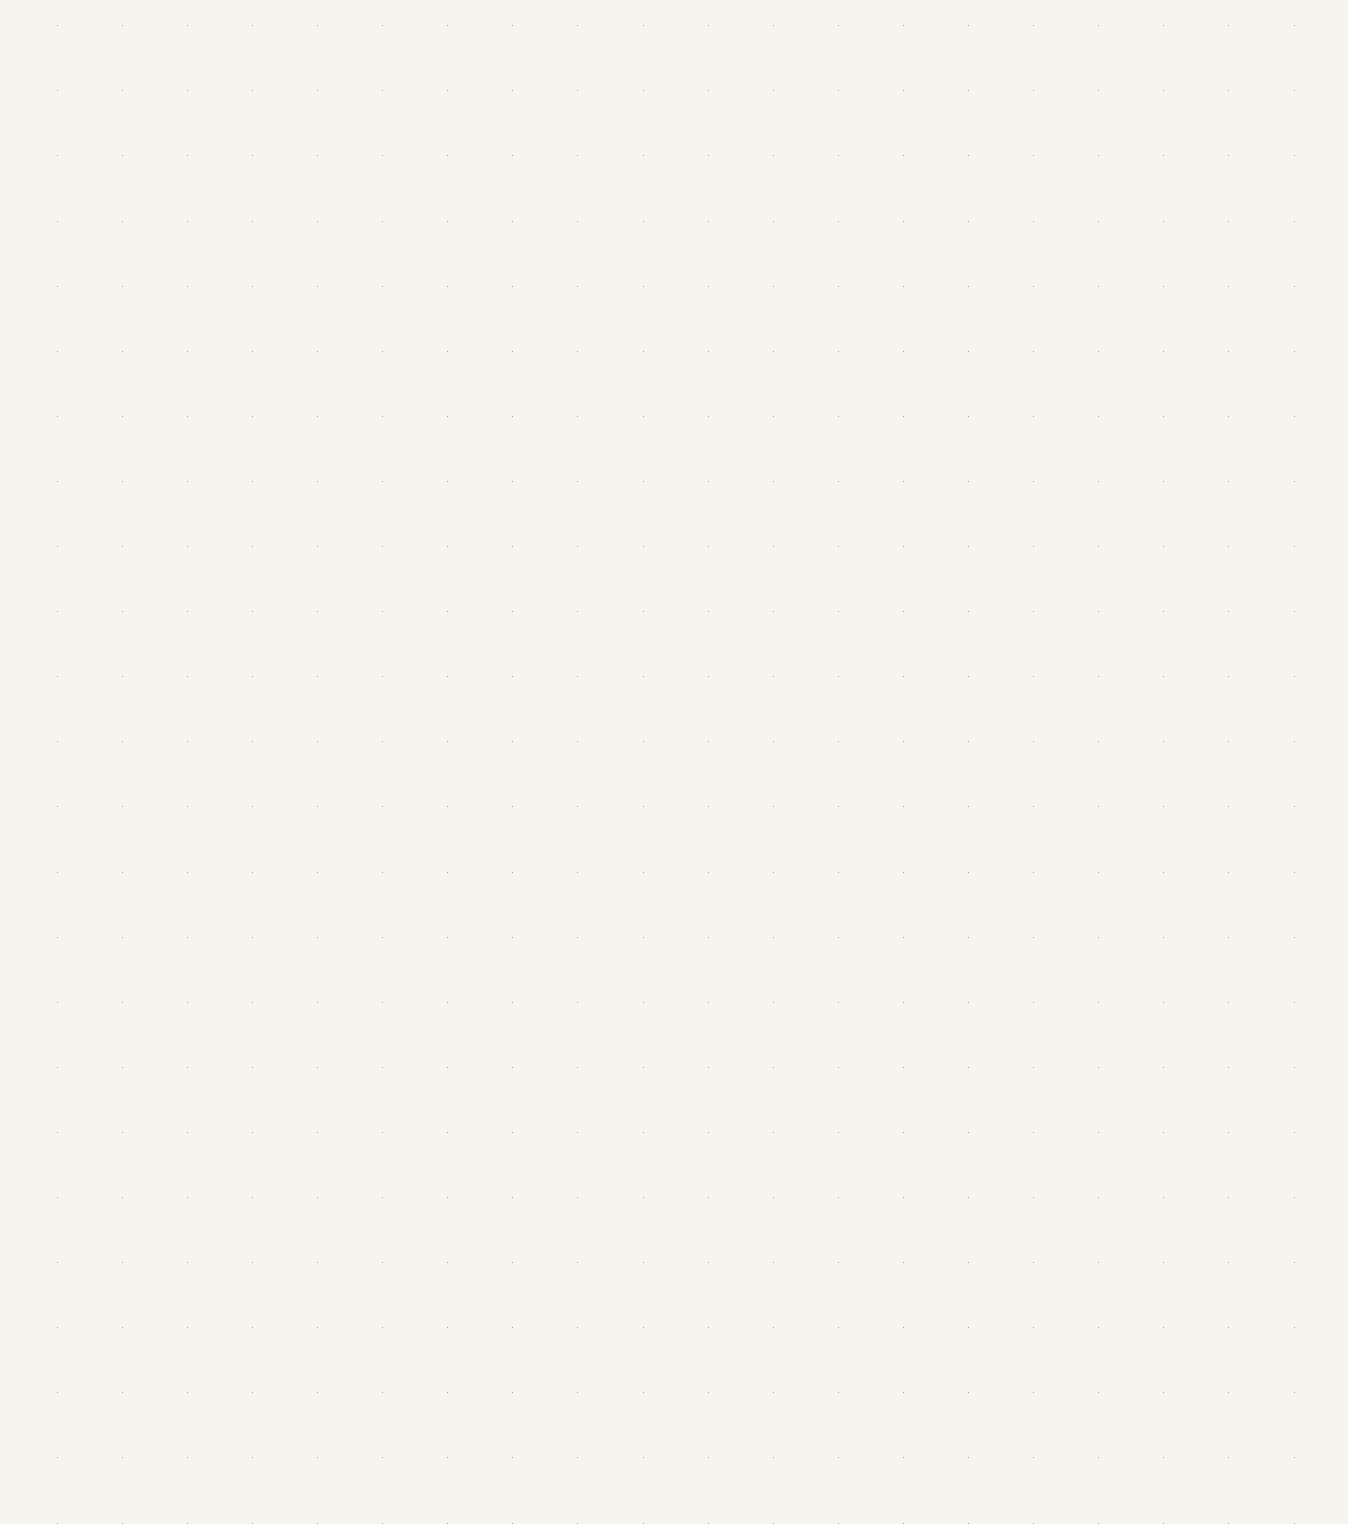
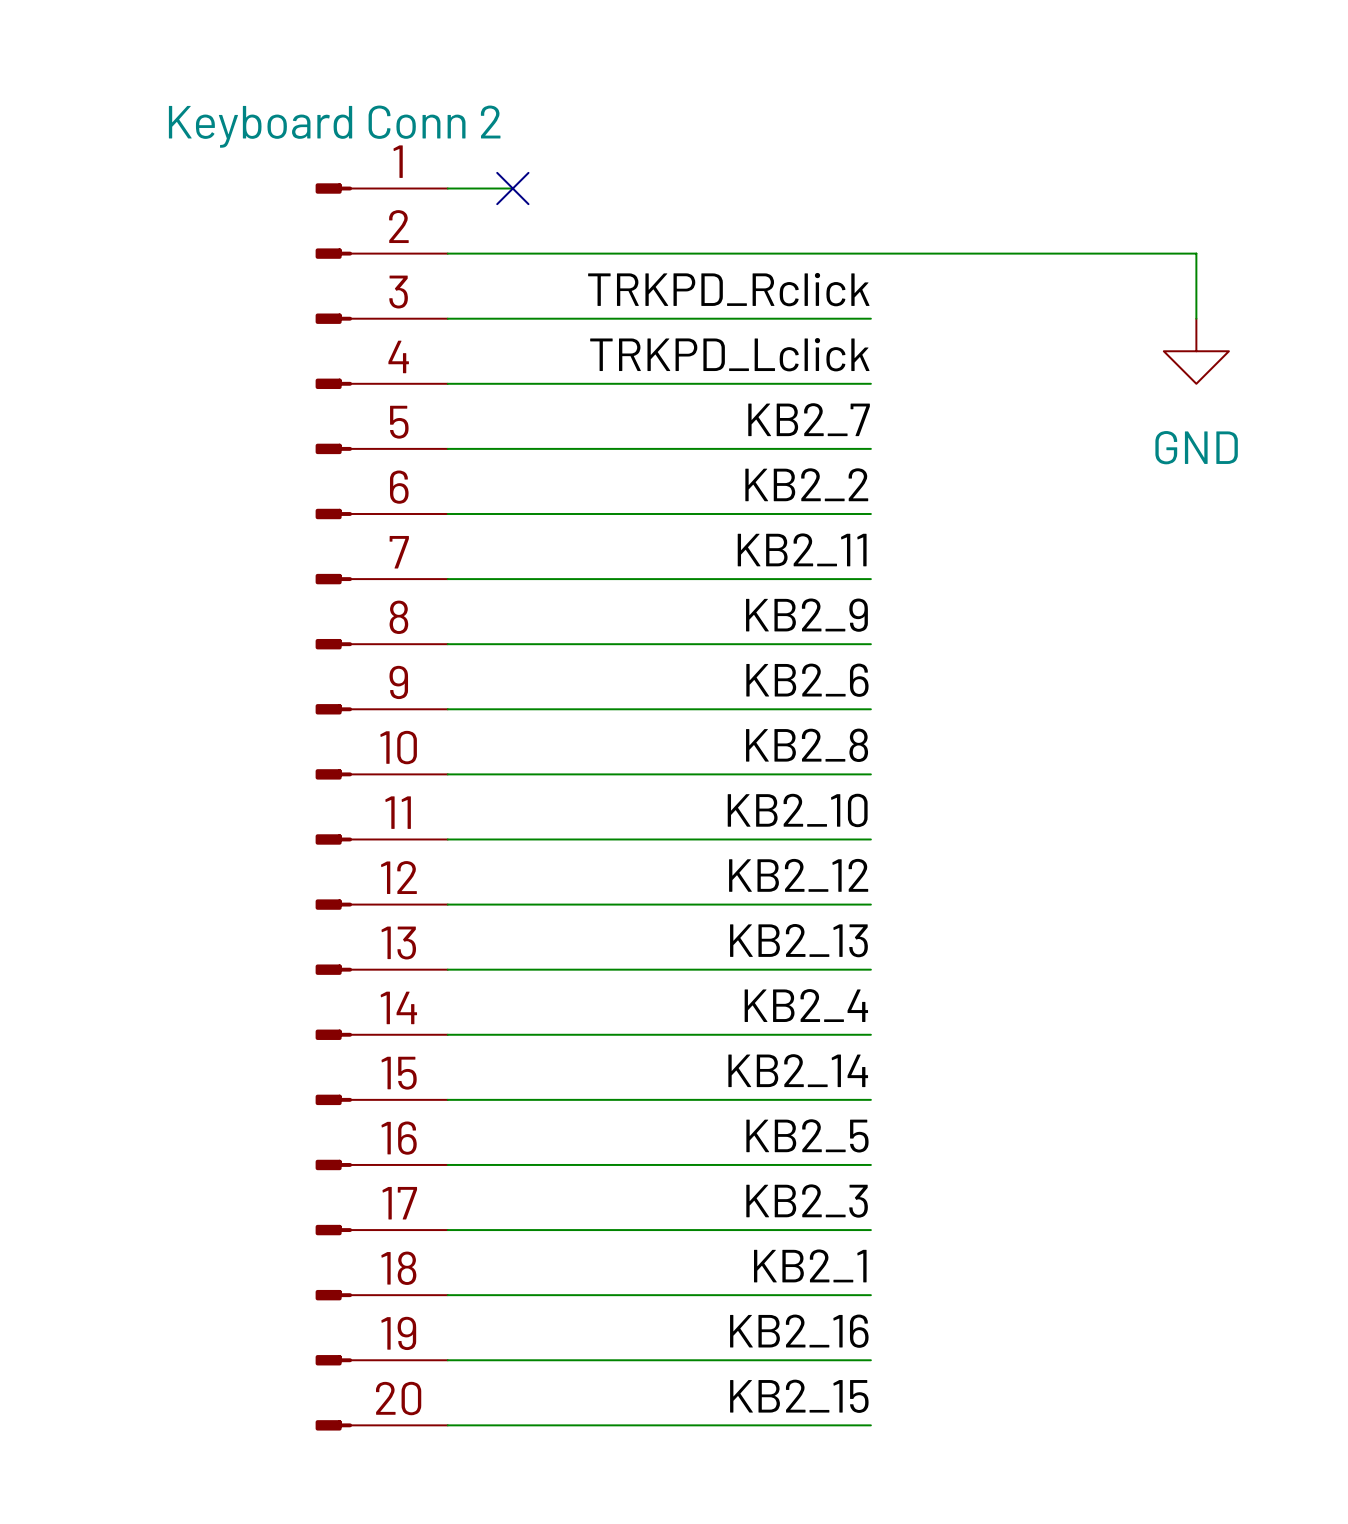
wire: none -> (447, 188) (512, 188)
no-connect mark: none -> (512, 188)
wire: none -> (447, 253) (1196, 253) (1196, 318)
label: none -> TRKPD_Rclick (728, 289)
wire: none -> (447, 318) (870, 318)
power symbol: none -> GND (1196, 351)
label: none -> TRKPD_Lclick (729, 354)
wire: none -> (447, 383) (870, 383)
label: none -> KB2_7 (809, 419)
wire: none -> (447, 448) (870, 448)
label: none -> KB2_2 (806, 484)
wire: none -> (447, 513) (870, 513)
label: none -> KB2_11 (802, 549)
wire: none -> (447, 579) (870, 579)
label: none -> KB2_9 (806, 615)
wire: none -> (447, 644) (870, 644)
label: none -> KB2_6 (807, 680)
wire: none -> (447, 709) (870, 709)
label: none -> KB2_8 (807, 745)
wire: none -> (447, 774) (870, 774)
part: none -> Keyboard Conn 2 (381, 806)
label: none -> KB2_10 (797, 810)
wire: none -> (447, 839) (870, 839)
label: none -> KB2_12 (798, 875)
wire: none -> (447, 904) (870, 904)
label: none -> KB2_13 (798, 940)
wire: none -> (447, 969) (870, 969)
label: none -> KB2_4 (806, 1005)
wire: none -> (447, 1034) (870, 1034)
label: none -> KB2_14 (798, 1070)
wire: none -> (447, 1099) (870, 1099)
label: none -> KB2_5 (807, 1135)
wire: none -> (447, 1164) (870, 1164)
label: none -> KB2_3 (807, 1201)
wire: none -> (447, 1230) (870, 1230)
label: none -> KB2_1 (810, 1265)
wire: none -> (447, 1295) (870, 1295)
label: none -> KB2_16 (799, 1331)
wire: none -> (447, 1360) (870, 1360)
label: none -> KB2_15 (799, 1396)
wire: none -> (447, 1425) (870, 1425)

